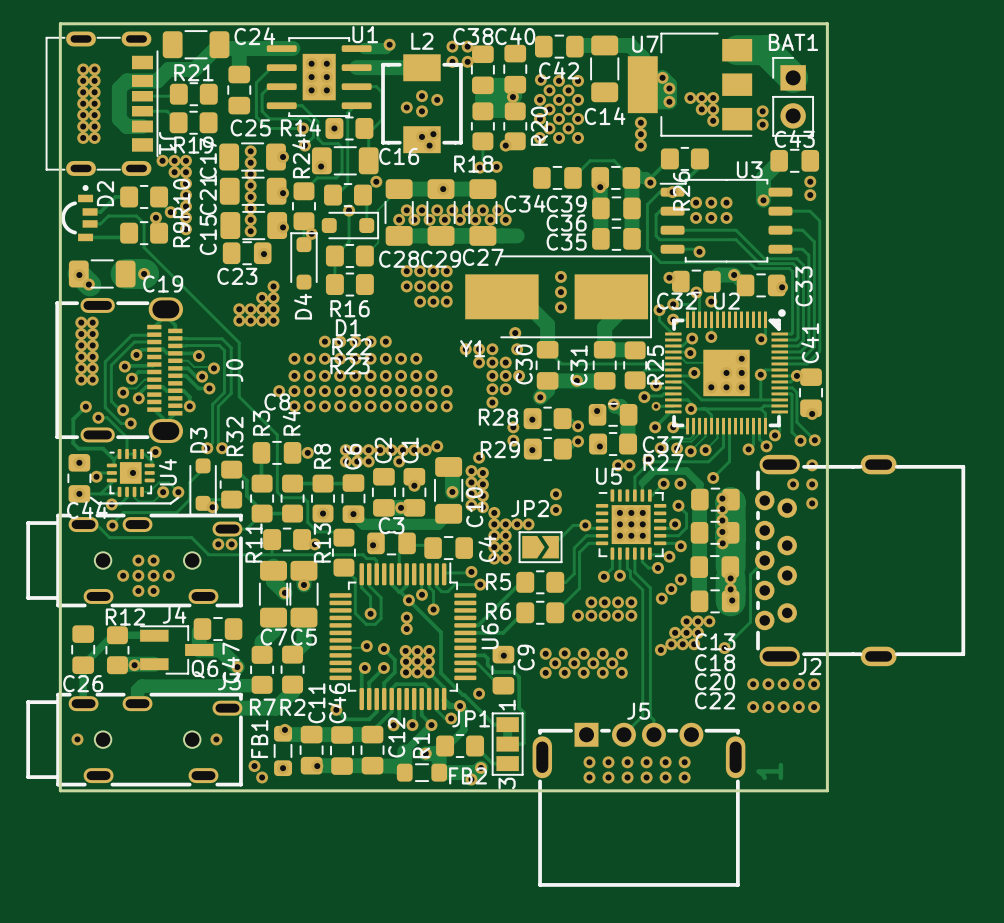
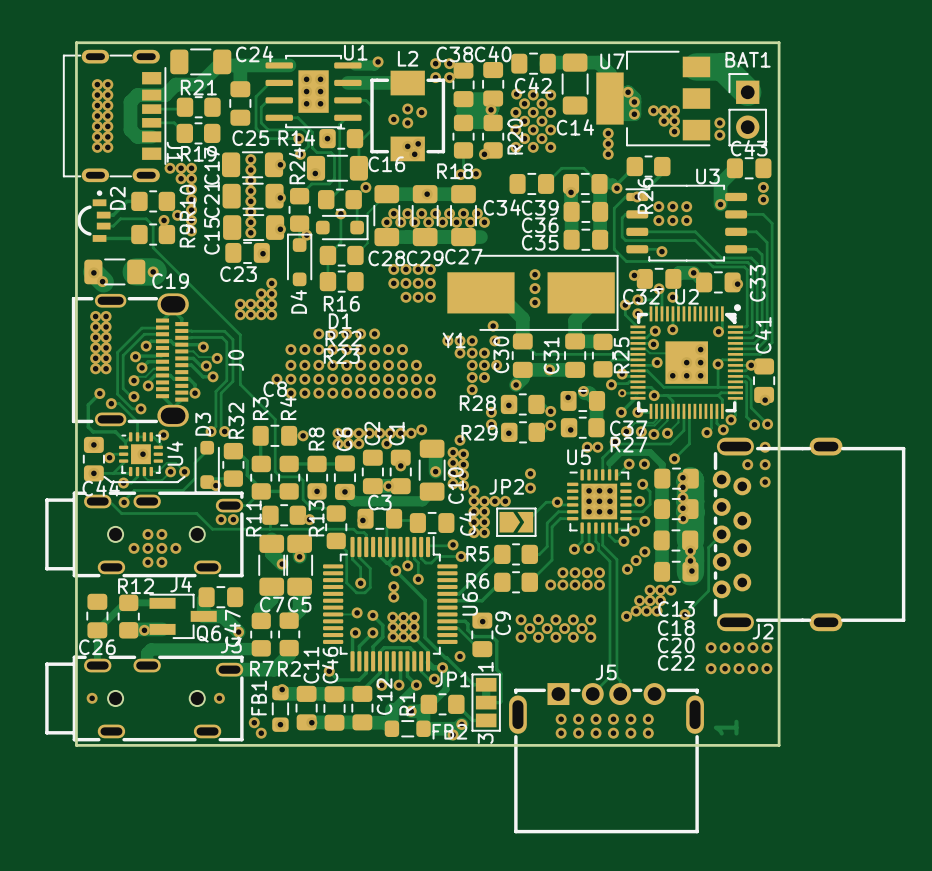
track: (501, 235) (517, 235) -> none

